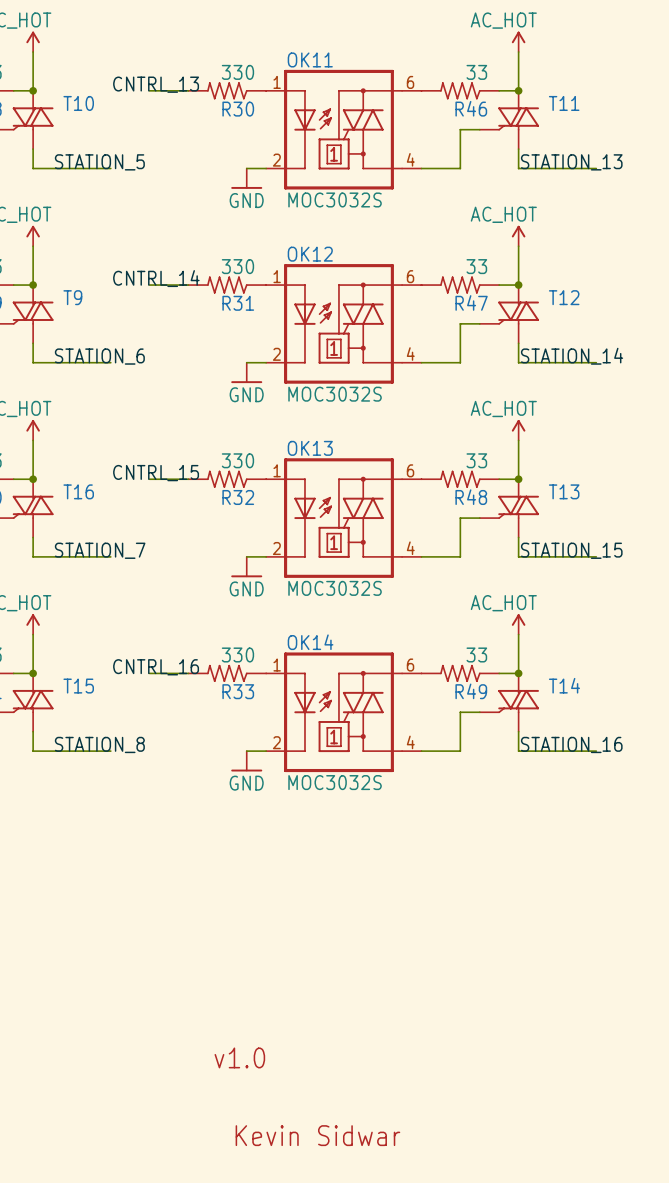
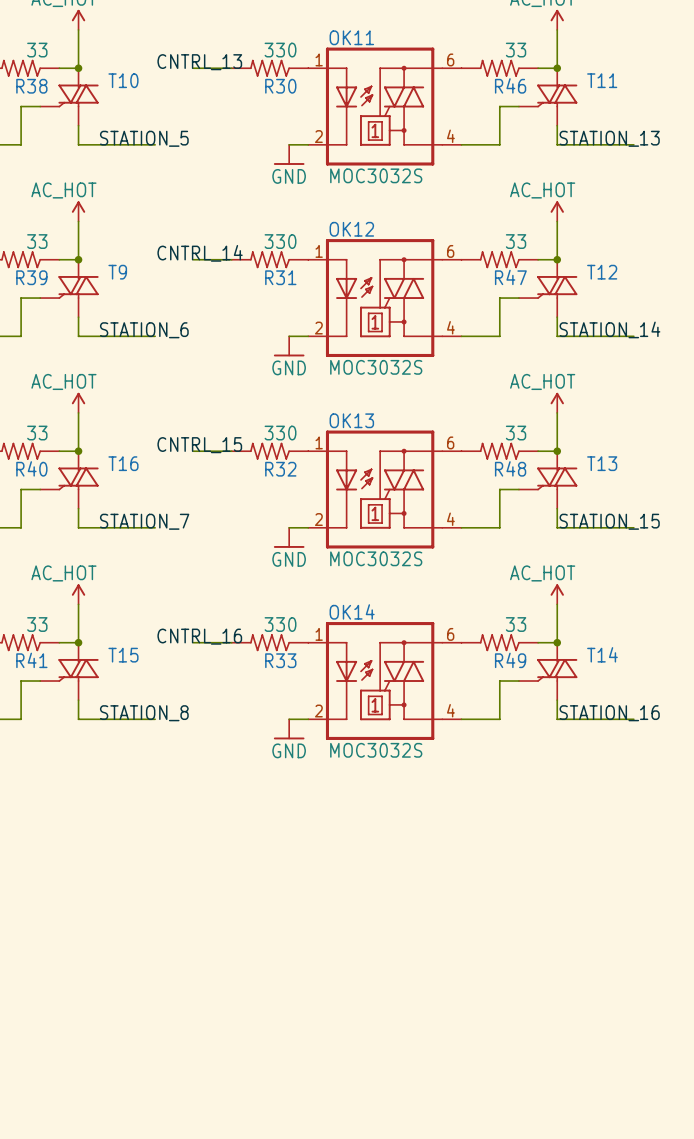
text: v1.0 (239, 1057) -> none
text: Kevin Sidwar (317, 1135) -> none

